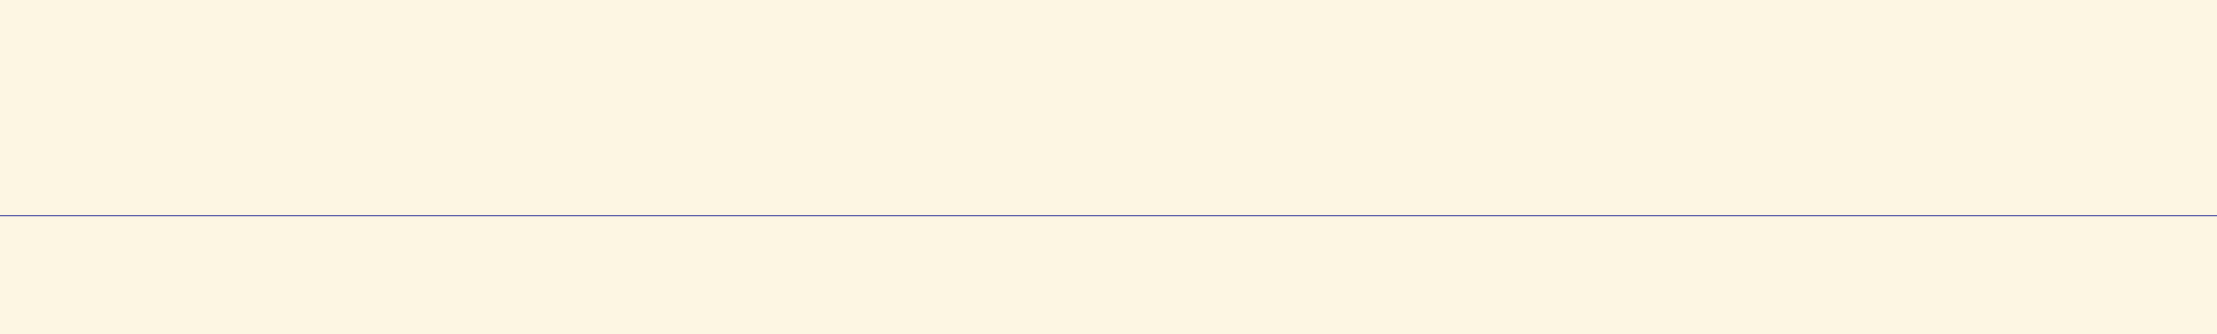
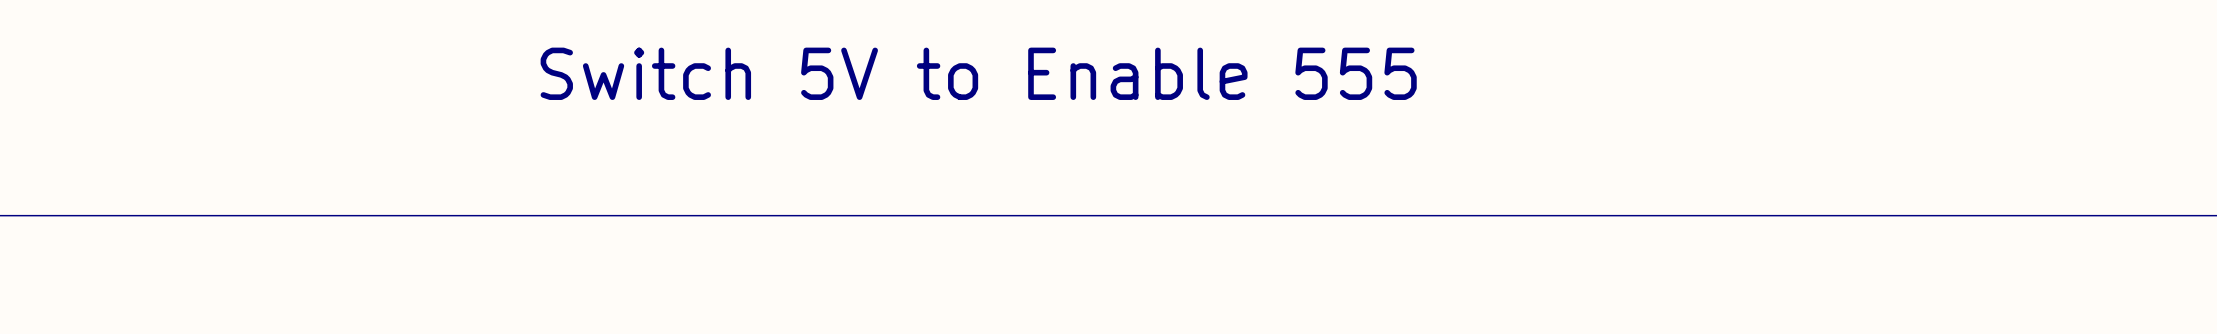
text: none -> Switch 5V to Enable 555 (978, 73)

